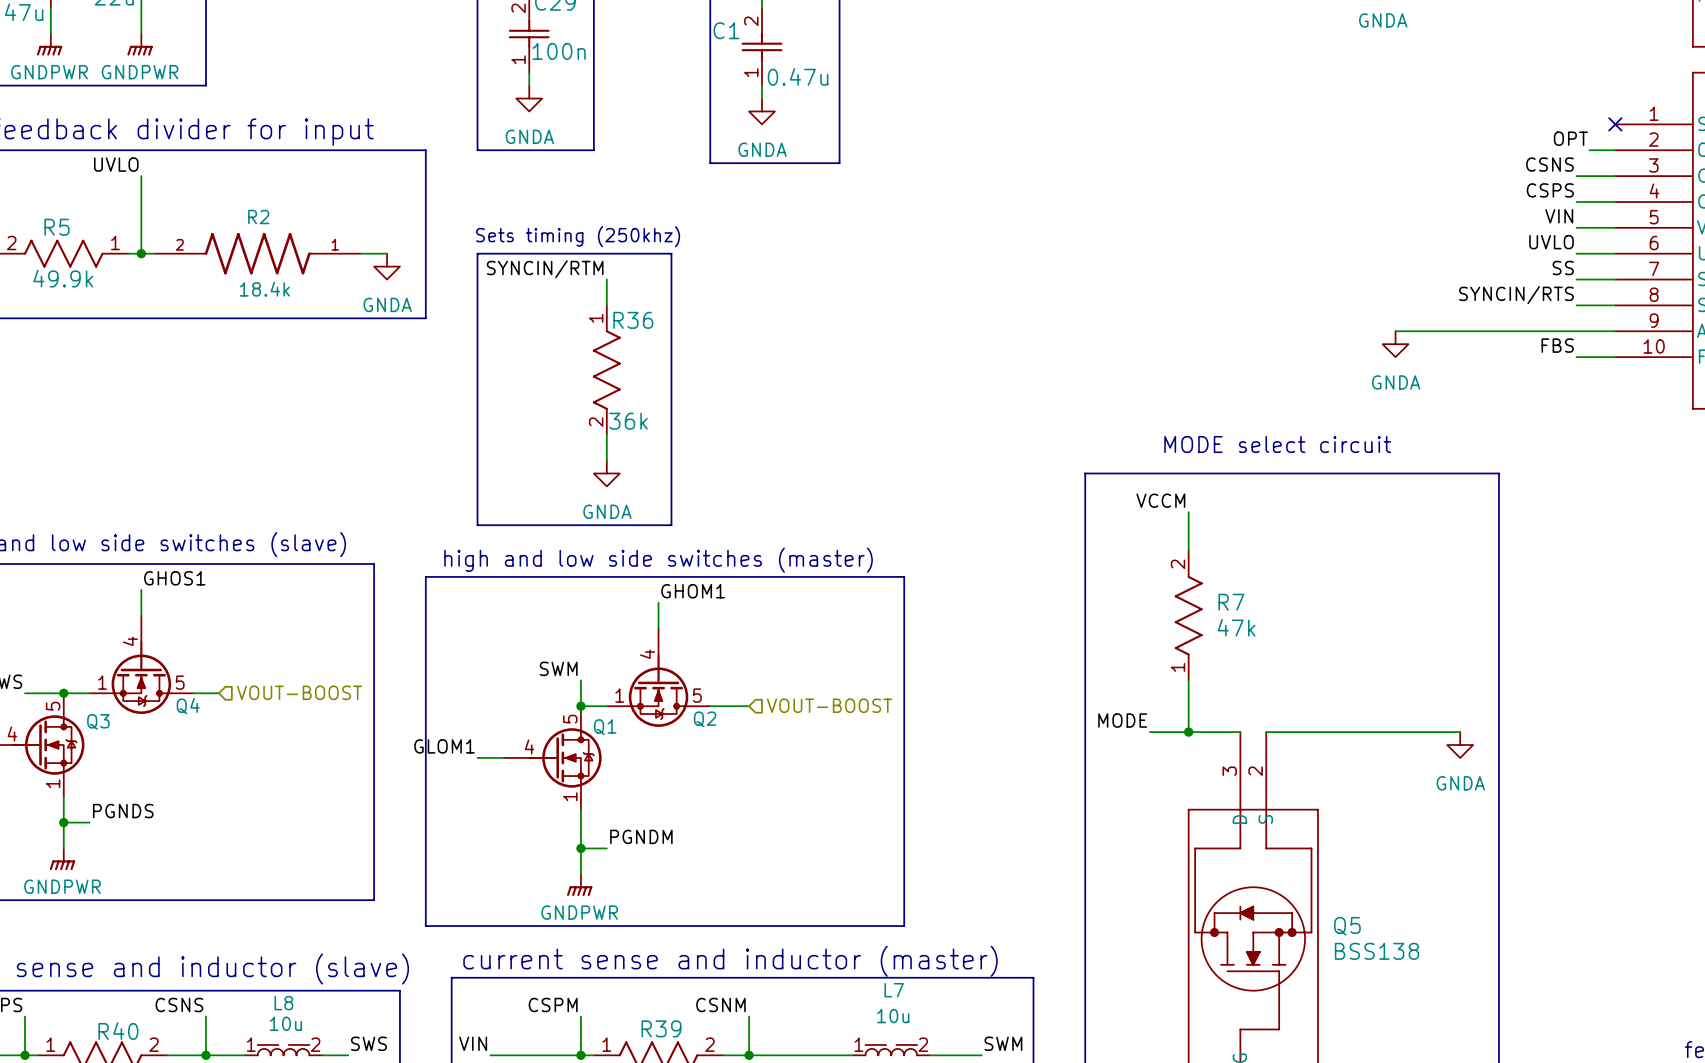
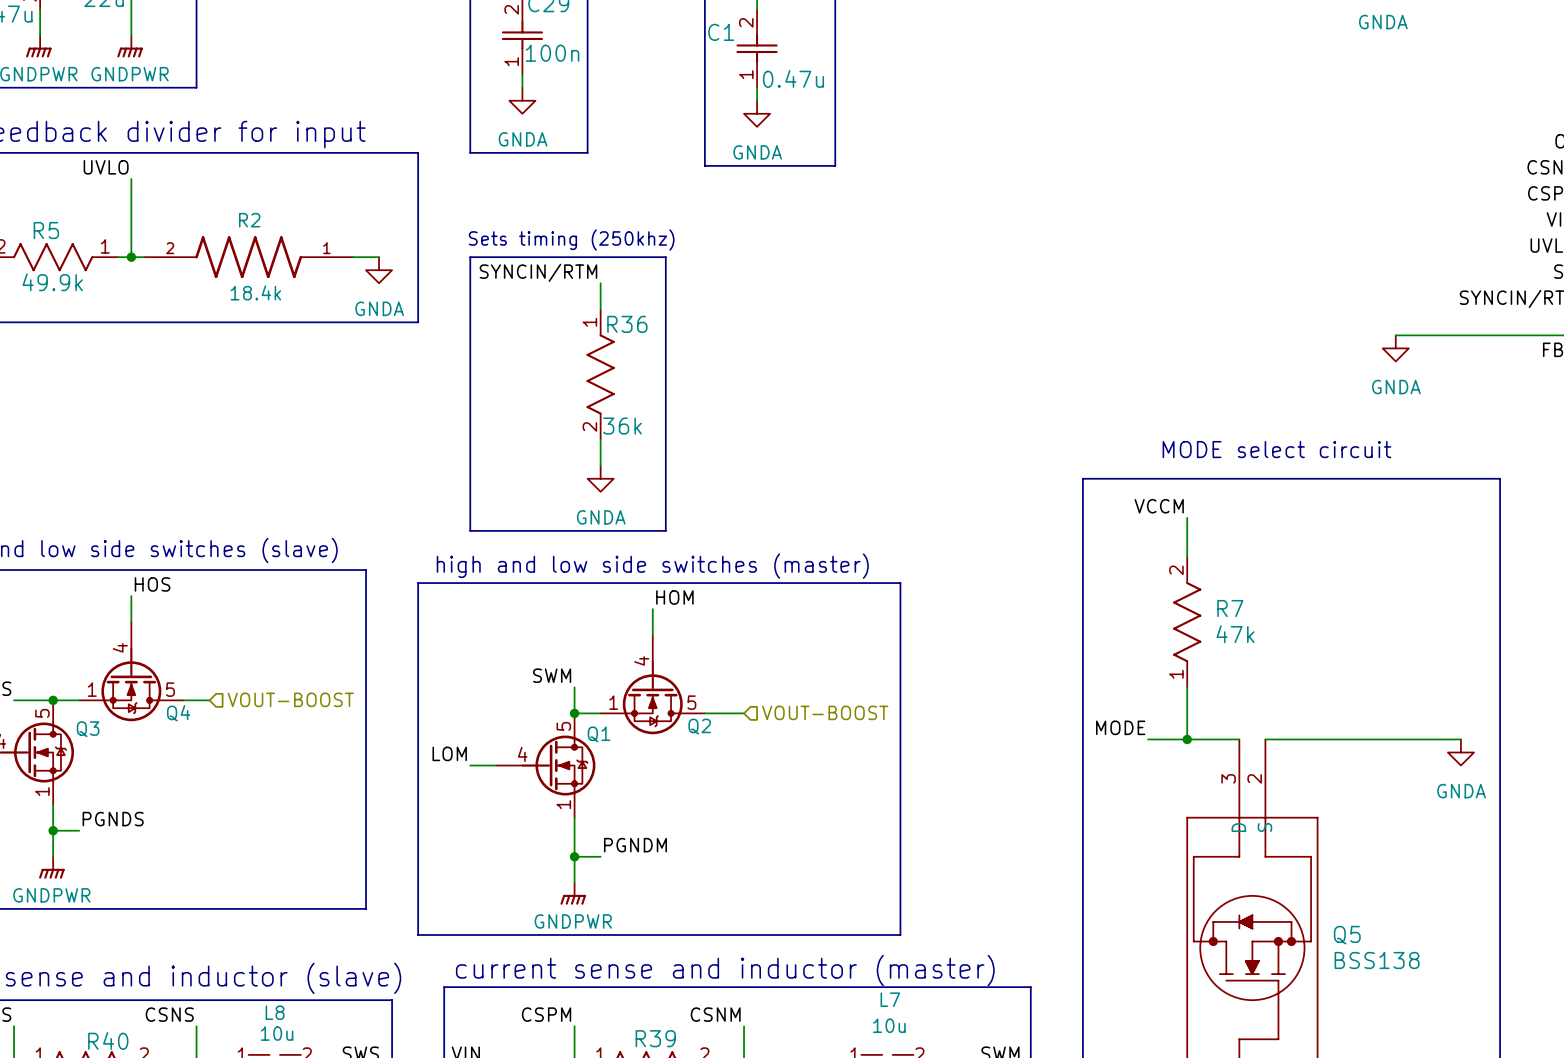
label: GHOS1 (174, 578) -> HOS (152, 584)
label: GHOM1 (693, 591) -> HOM (674, 597)
label: GLOM1 (444, 746) -> LOM (449, 753)

